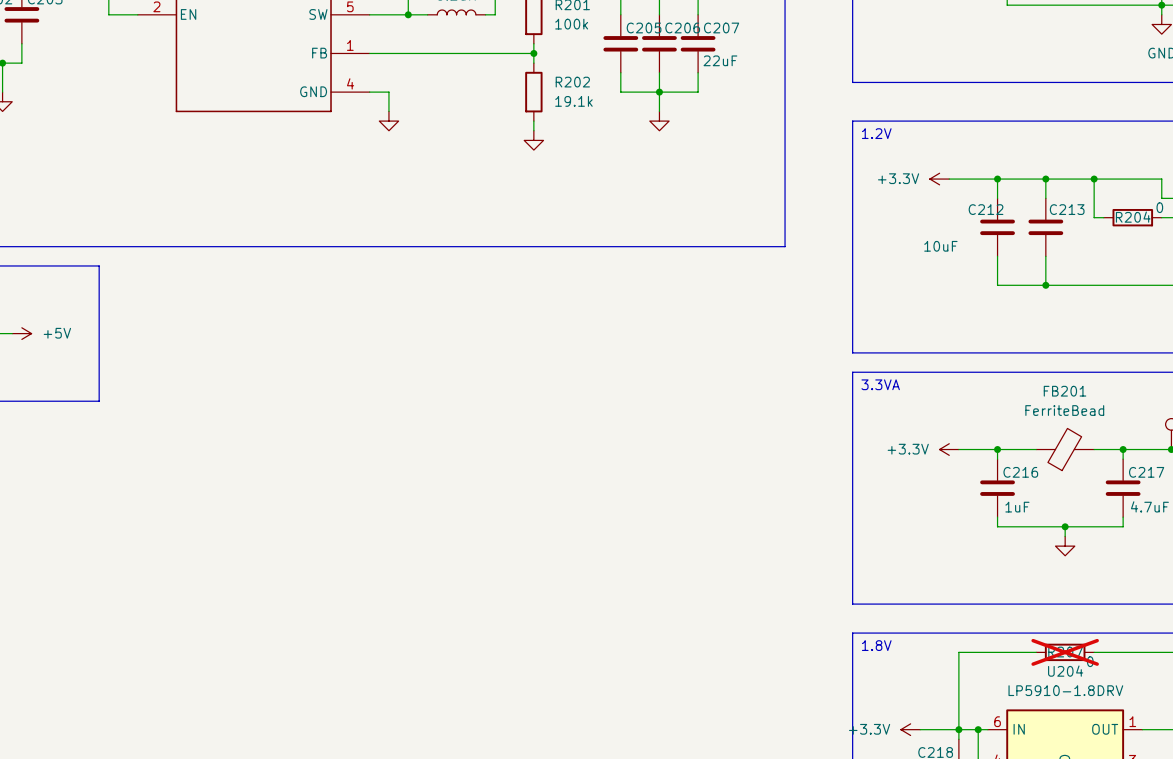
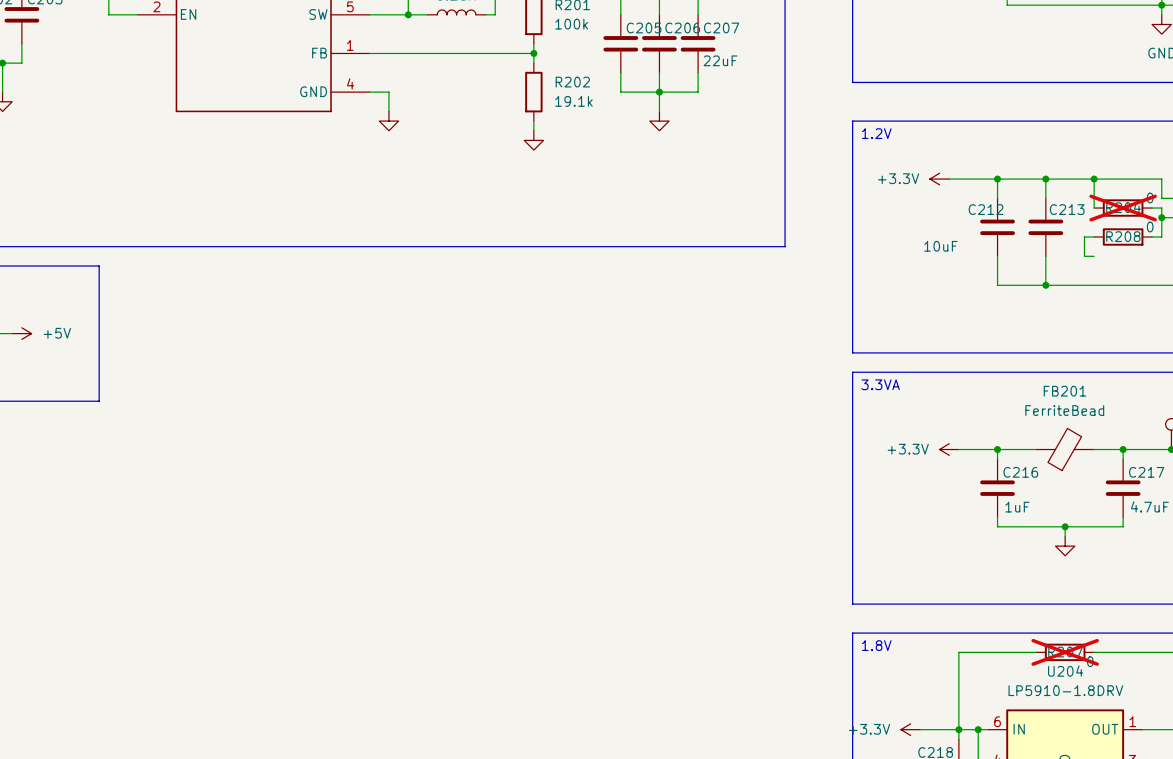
wire: (1094, 208) (1094, 217) (1103, 217) -> none
R204 do-not-place cross: none -> (1123, 208)
wire: none -> (1152, 208) (1161, 208) (1161, 237) (1152, 237)
R204 position: (1132, 217) -> (1123, 208)
junction: none -> (1161, 217)
wire: none -> (1094, 237) (1084, 237) (1084, 256) (1094, 256)
R208: none -> 0 (1123, 237)

